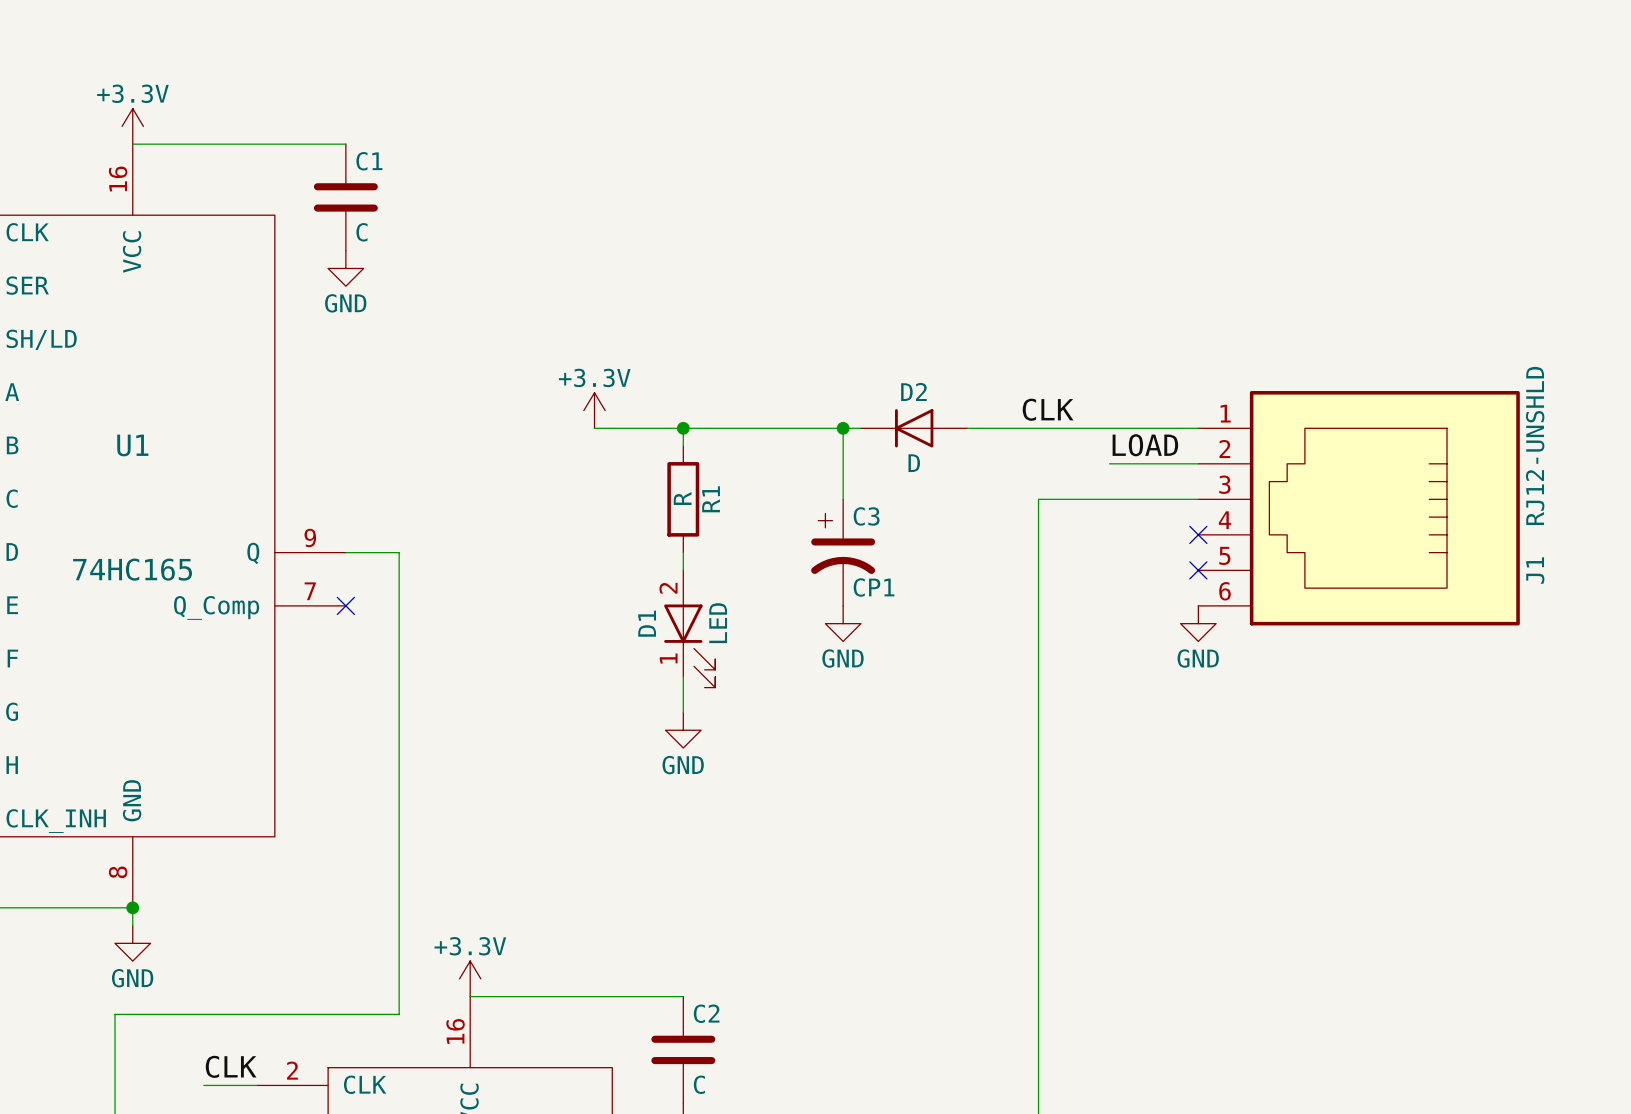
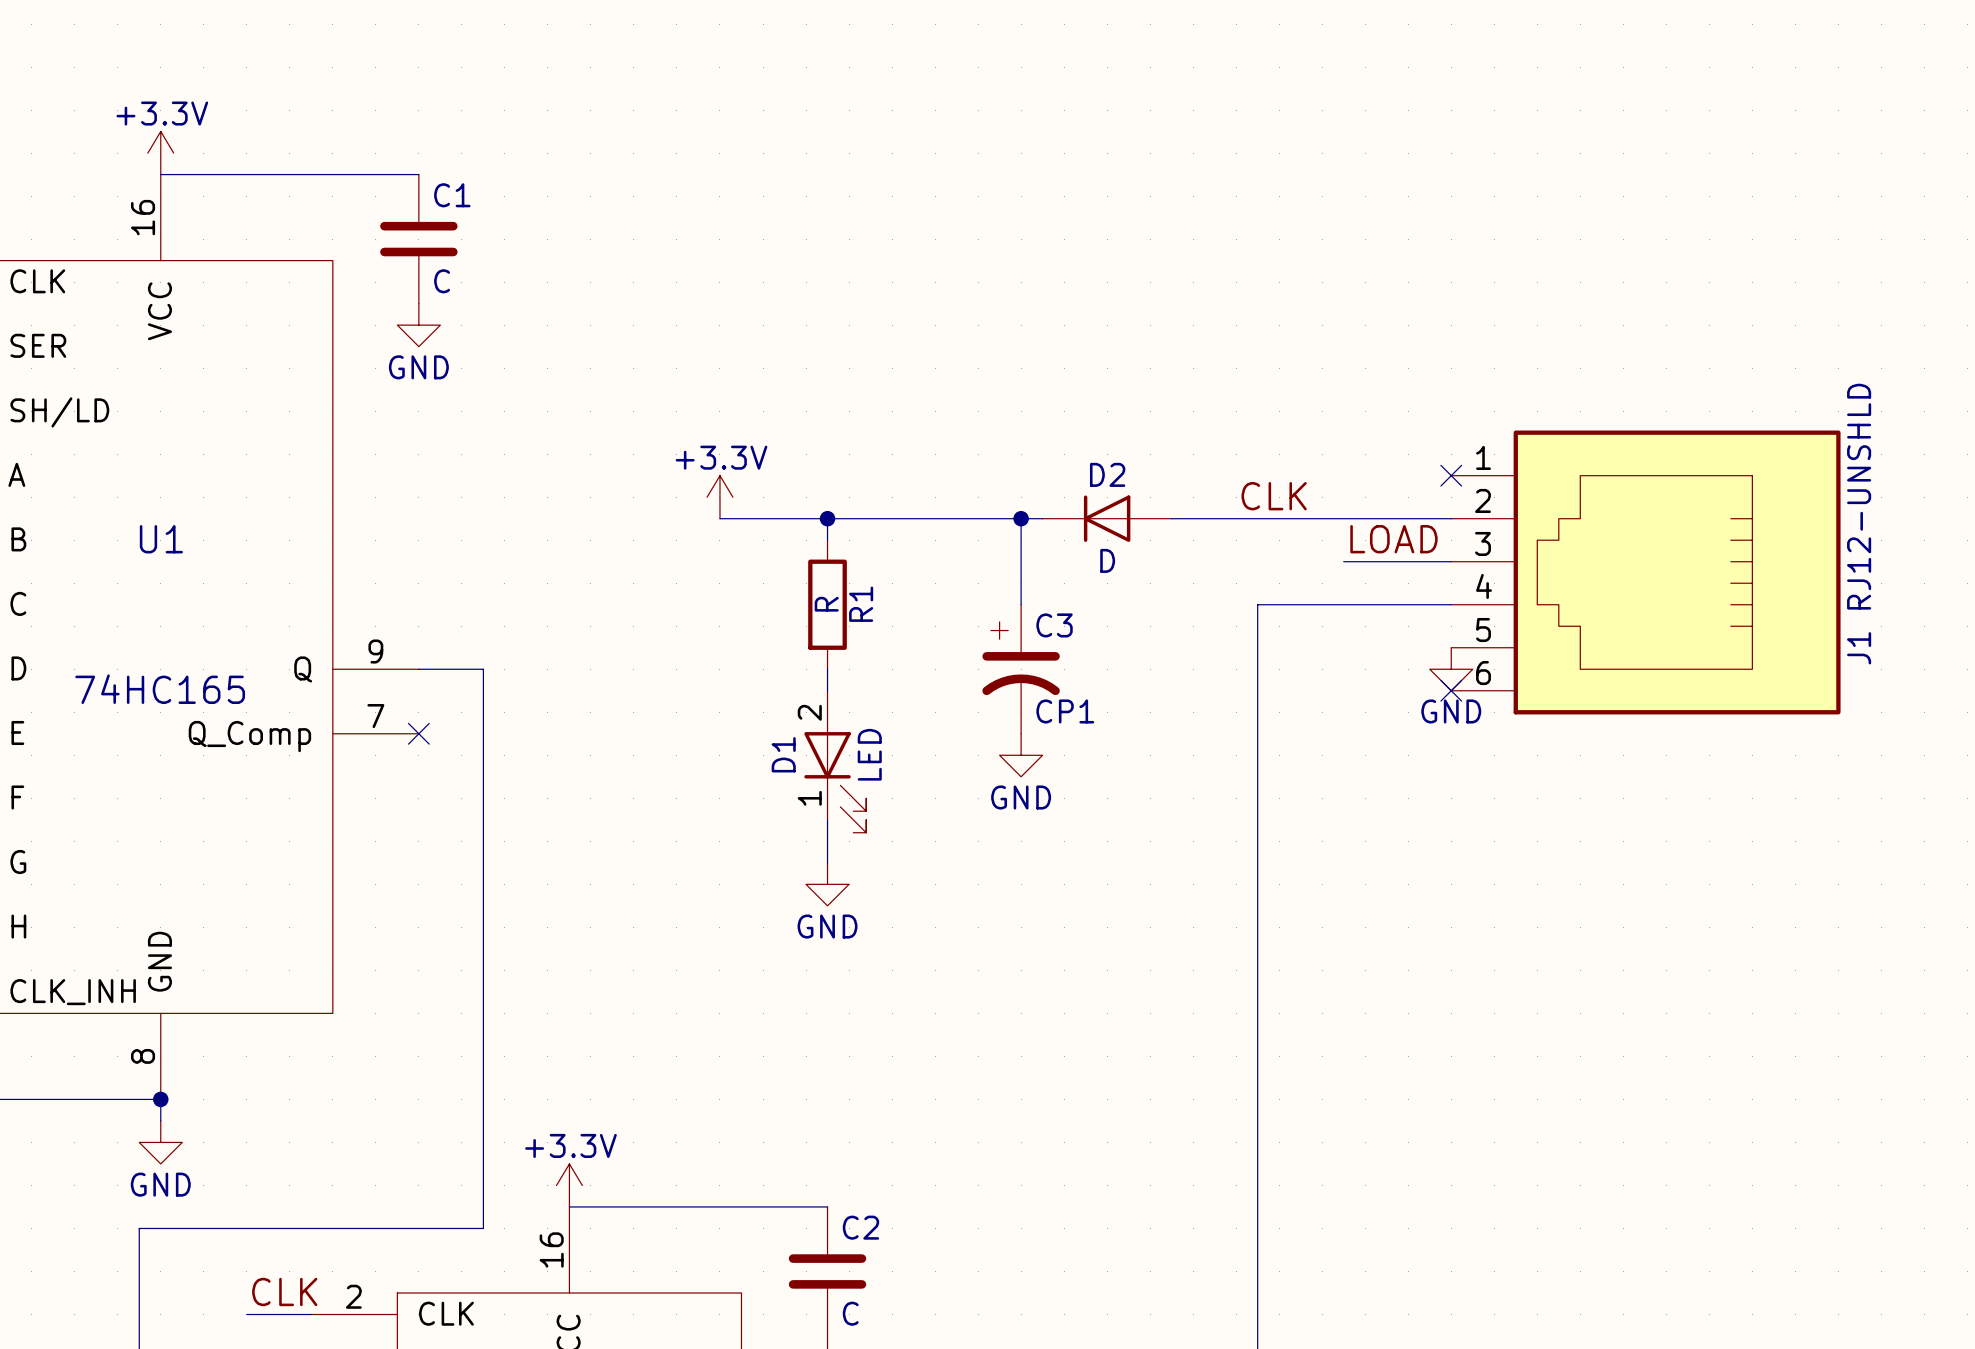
no-connect mark: none -> (1451, 475)
J1 position: (1359, 508) -> (1645, 572)
no-connect mark: (1198, 534) -> none
power symbol position: GND (1198, 623) -> GND (1451, 669)

